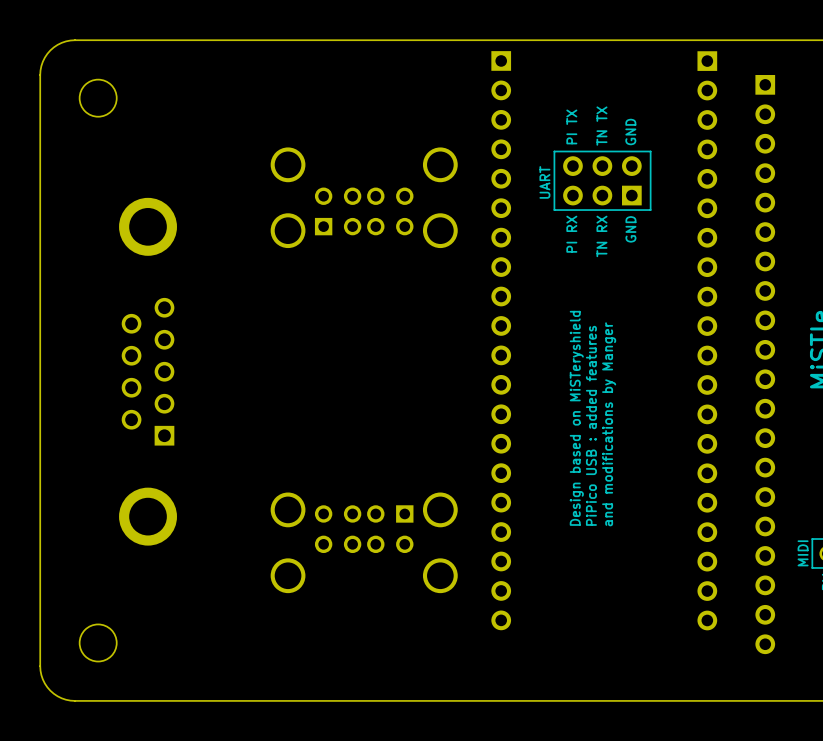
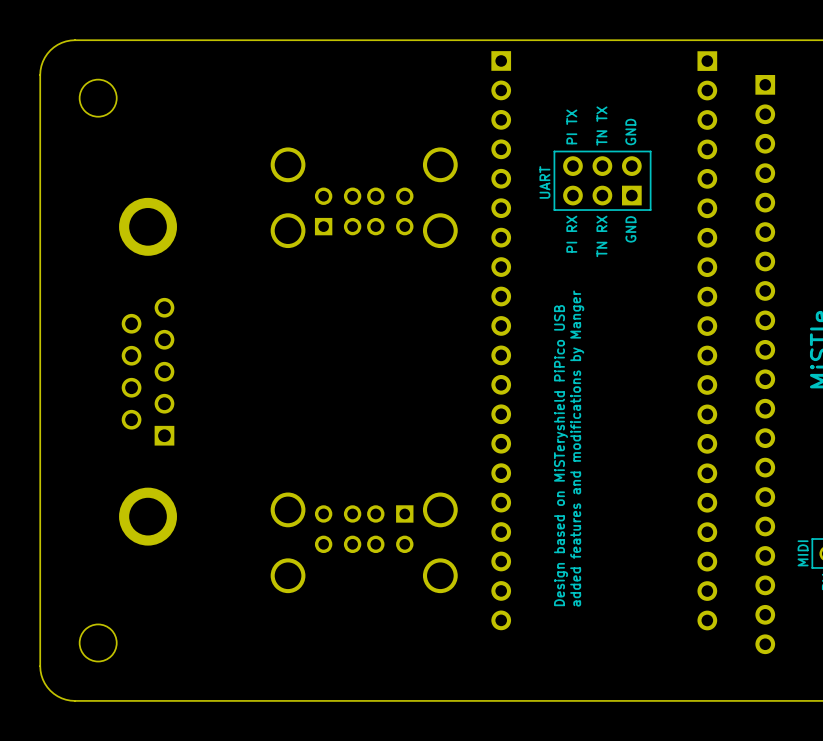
text: Design based on MiSTeryshield (576, 418) -> Design based on MiSTeryshield PiPico USB (561, 455)
text: and modifications by Manger (609, 424) -> none
text: PiPico USB : added features (591, 425) -> none
text: none -> added features and modifications by Manger (577, 448)

